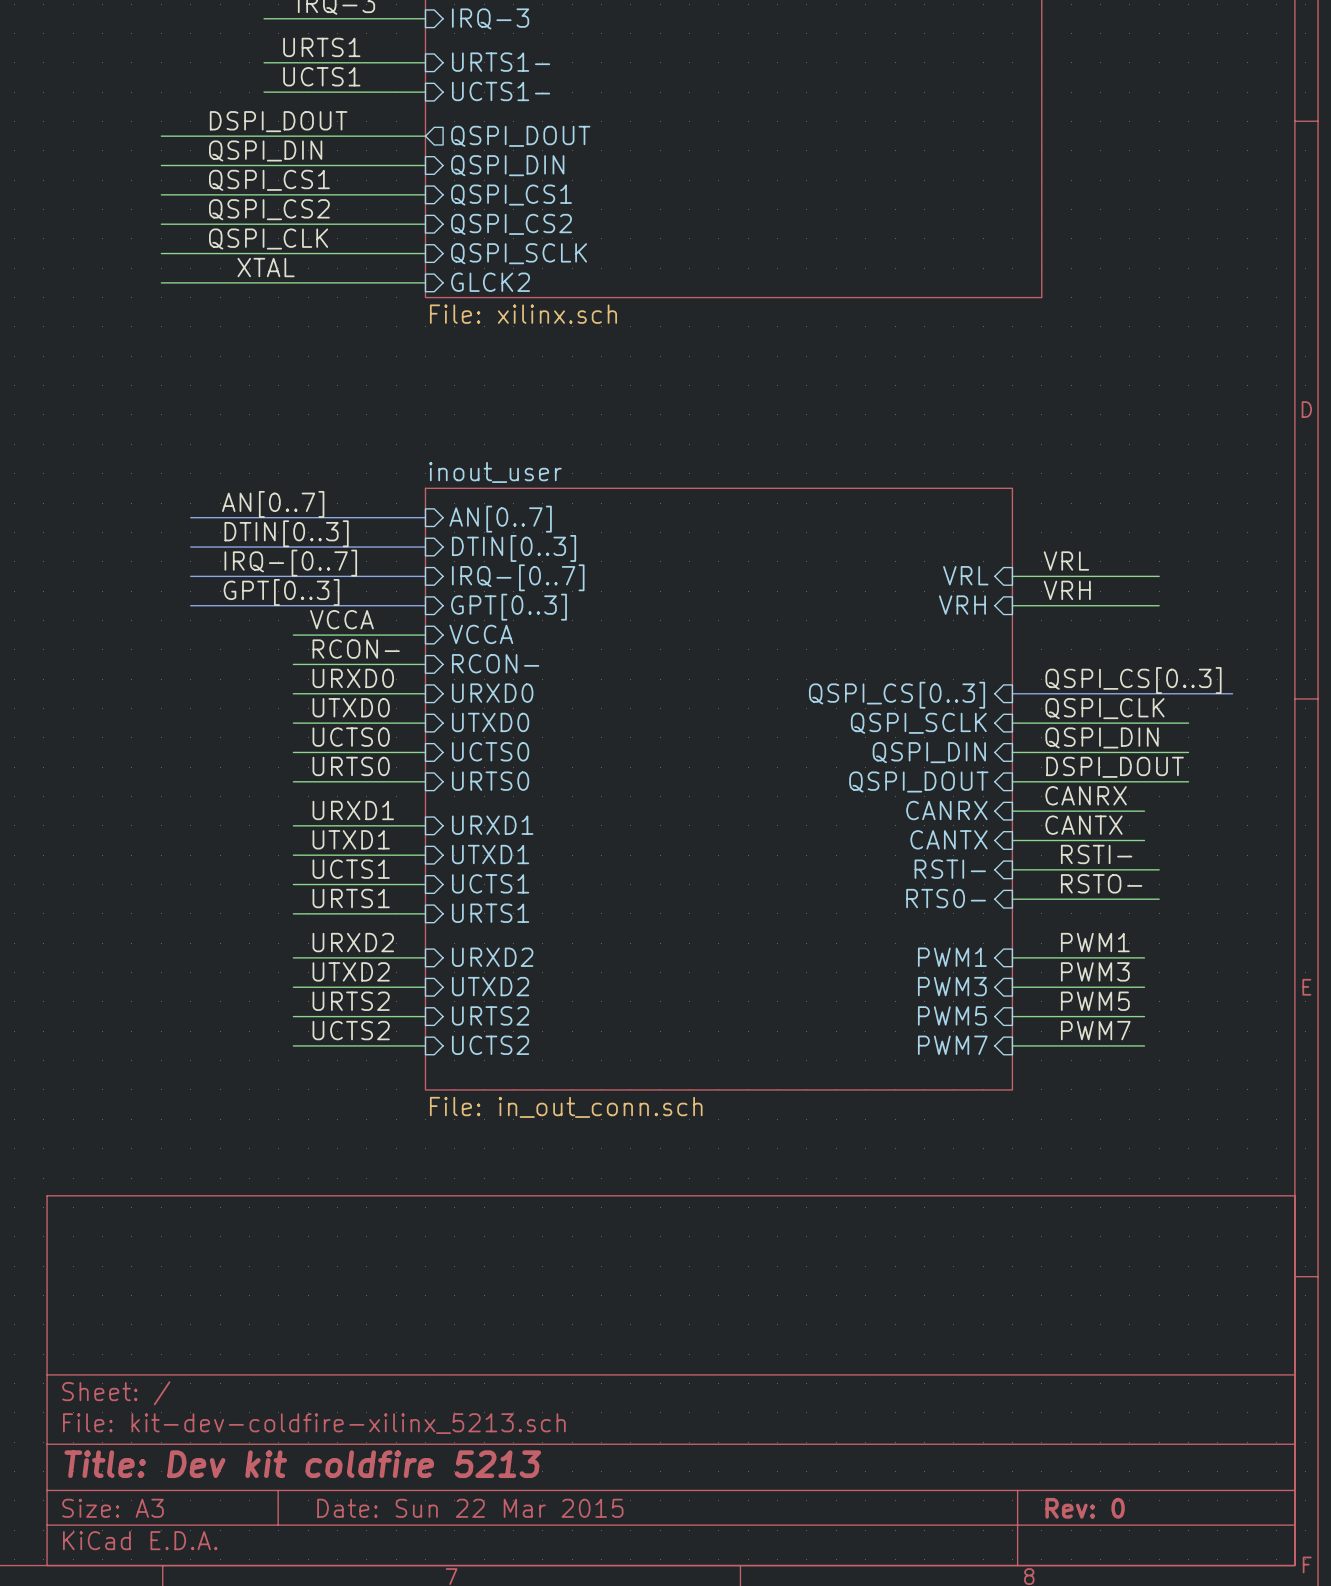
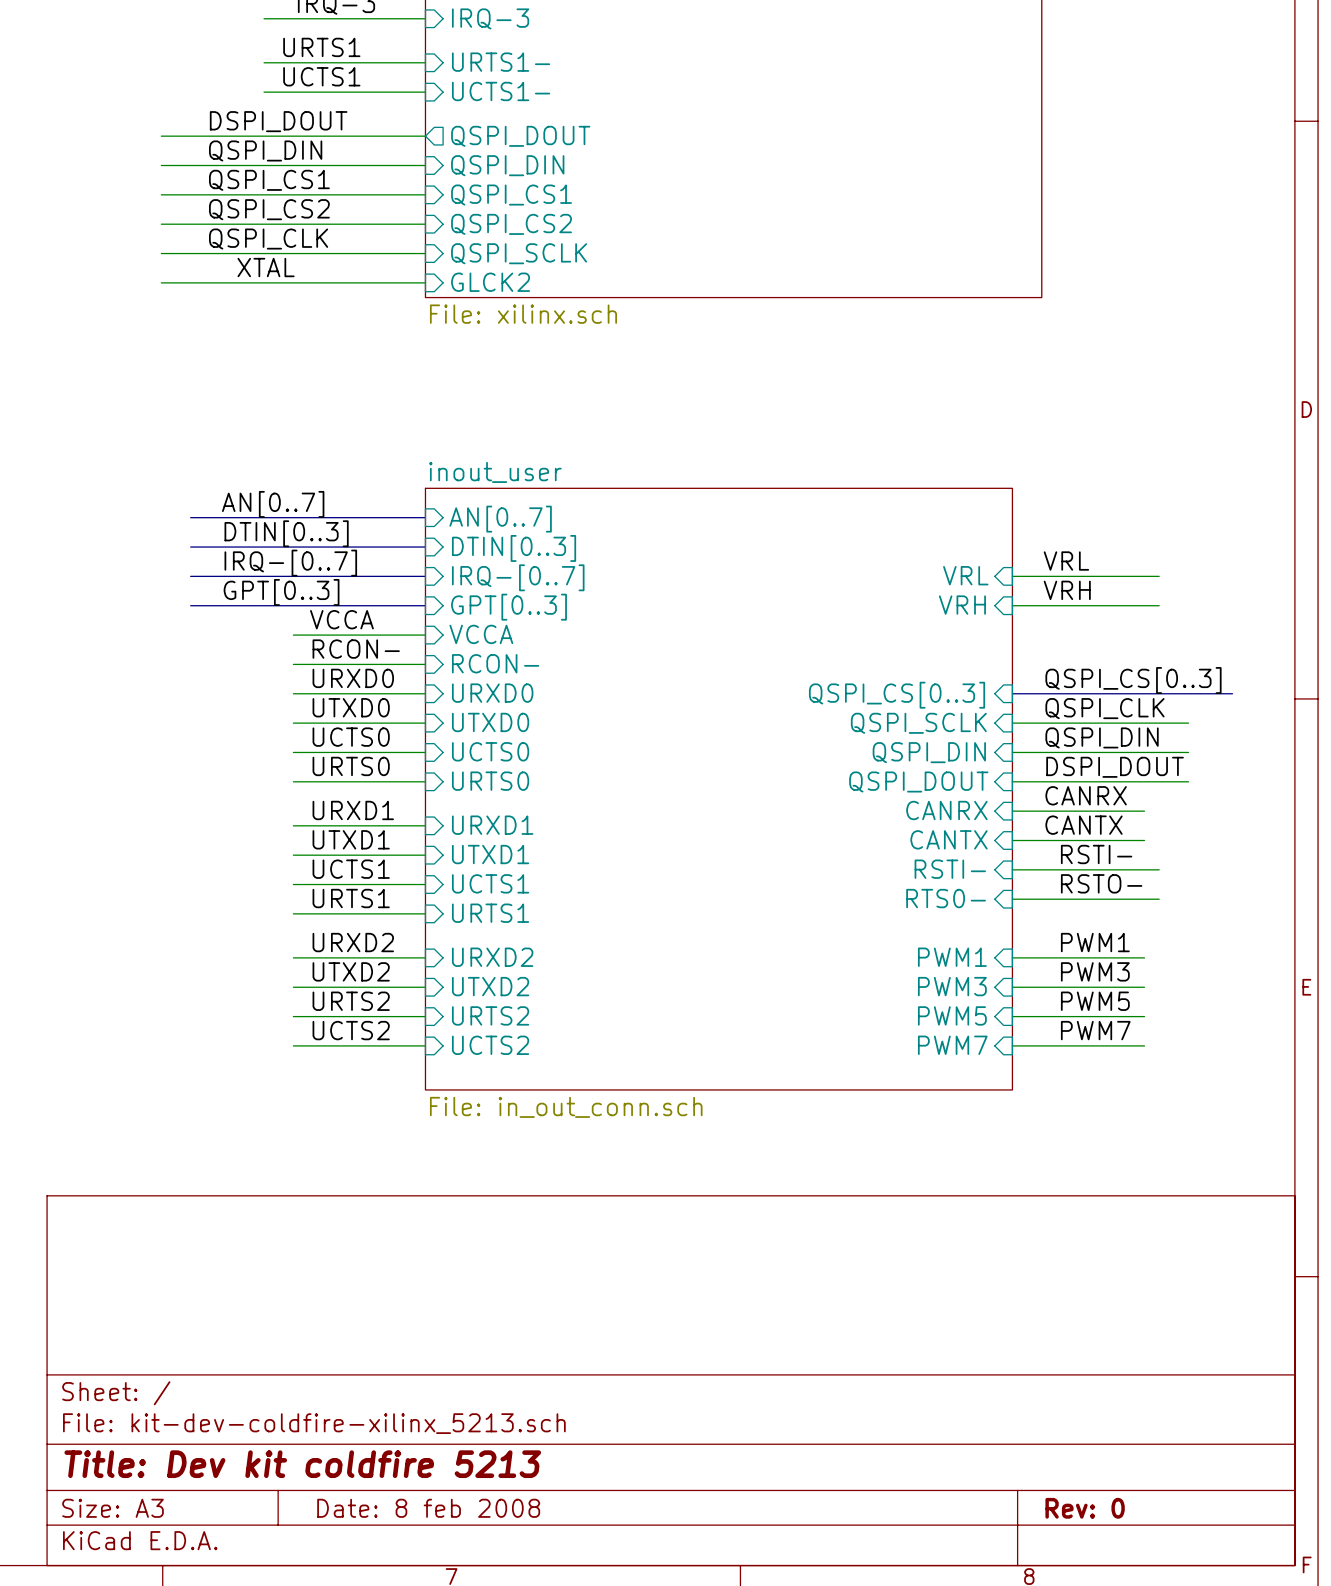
title block: Date: Sun 22 Mar 2015 (470, 1508) -> Date: 8 feb 2008 (428, 1508)

